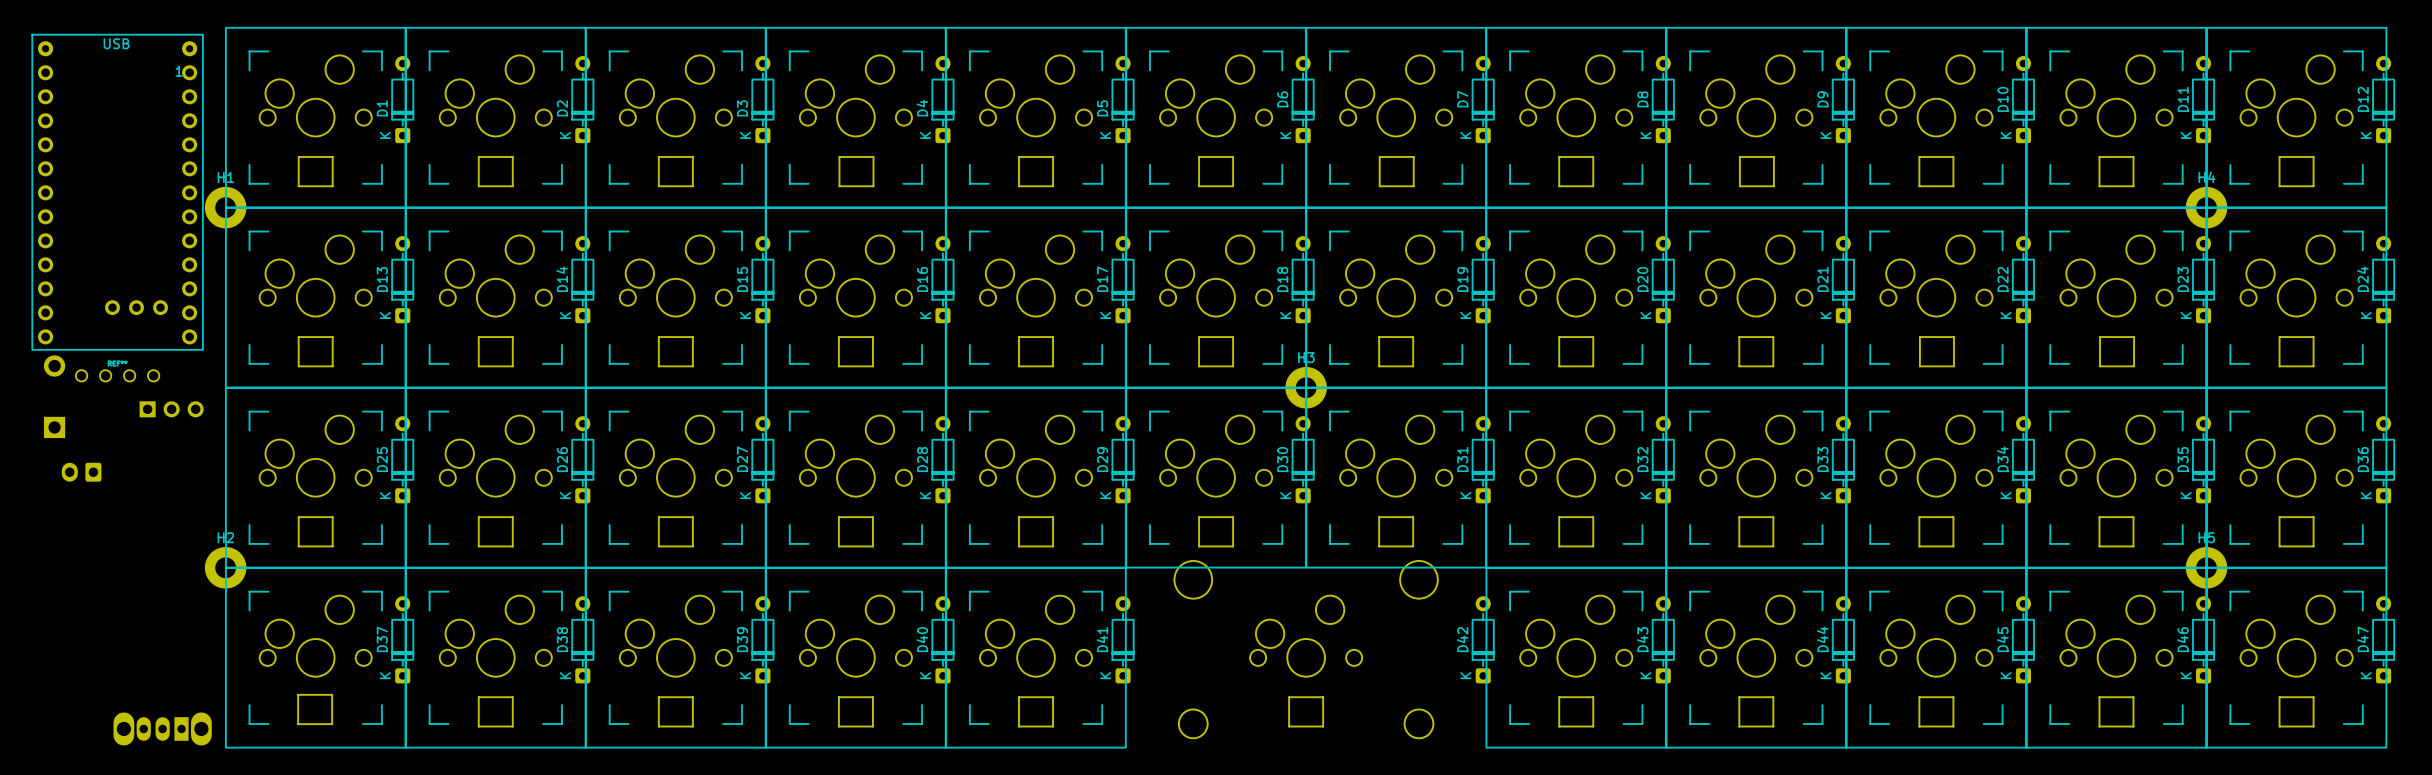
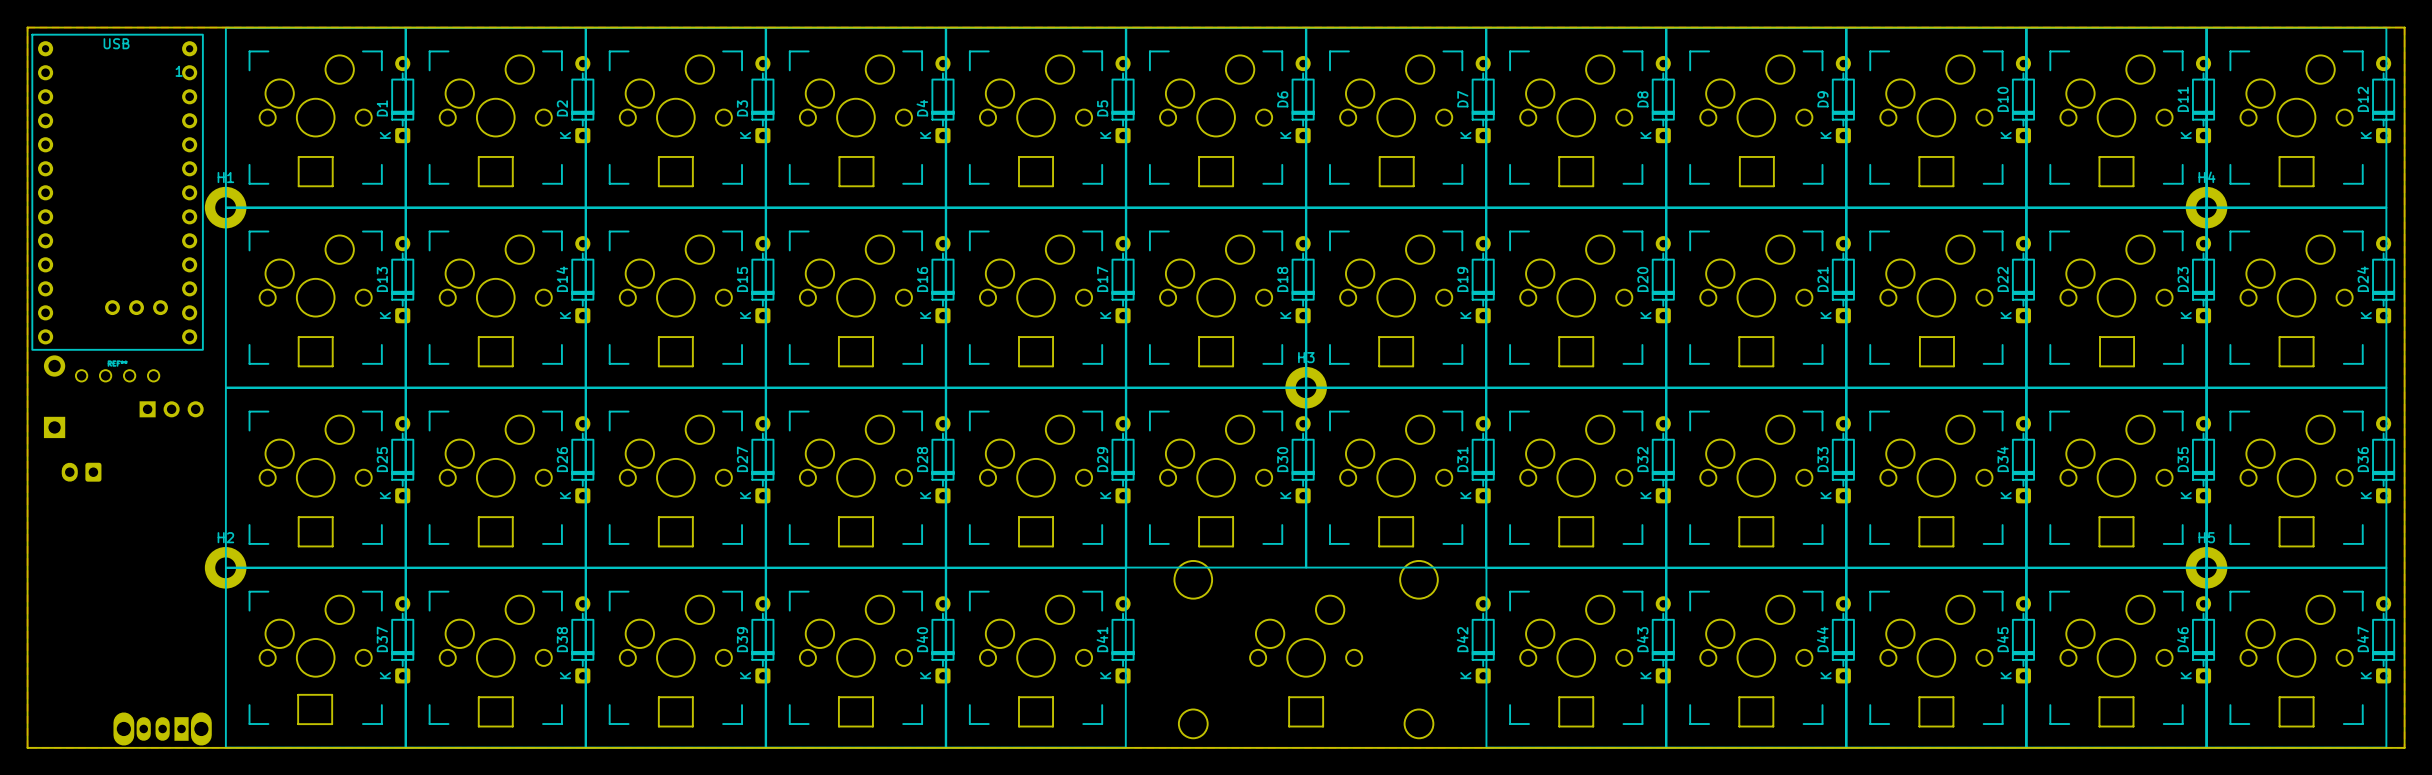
board edge: none -> (27, 27) (2404, 27) (2404, 747) (27, 747) (27, 27)

